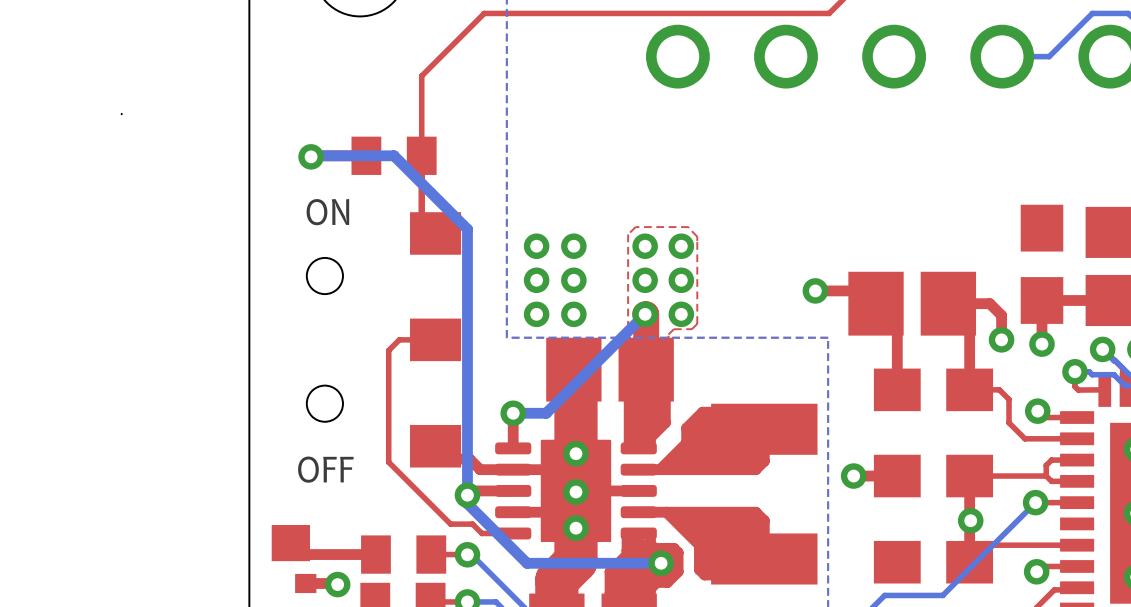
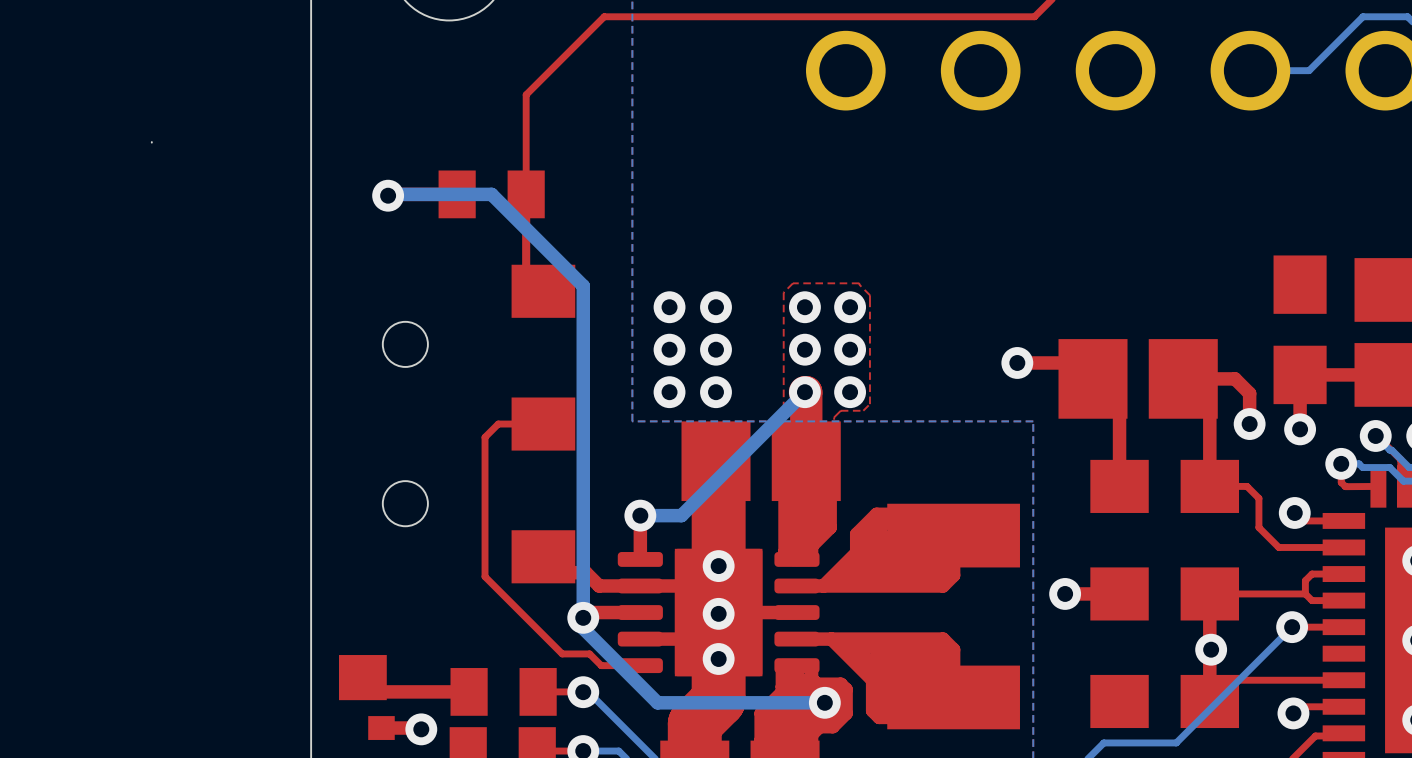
text: ON (327, 212) -> none
text: OFF (325, 469) -> none

